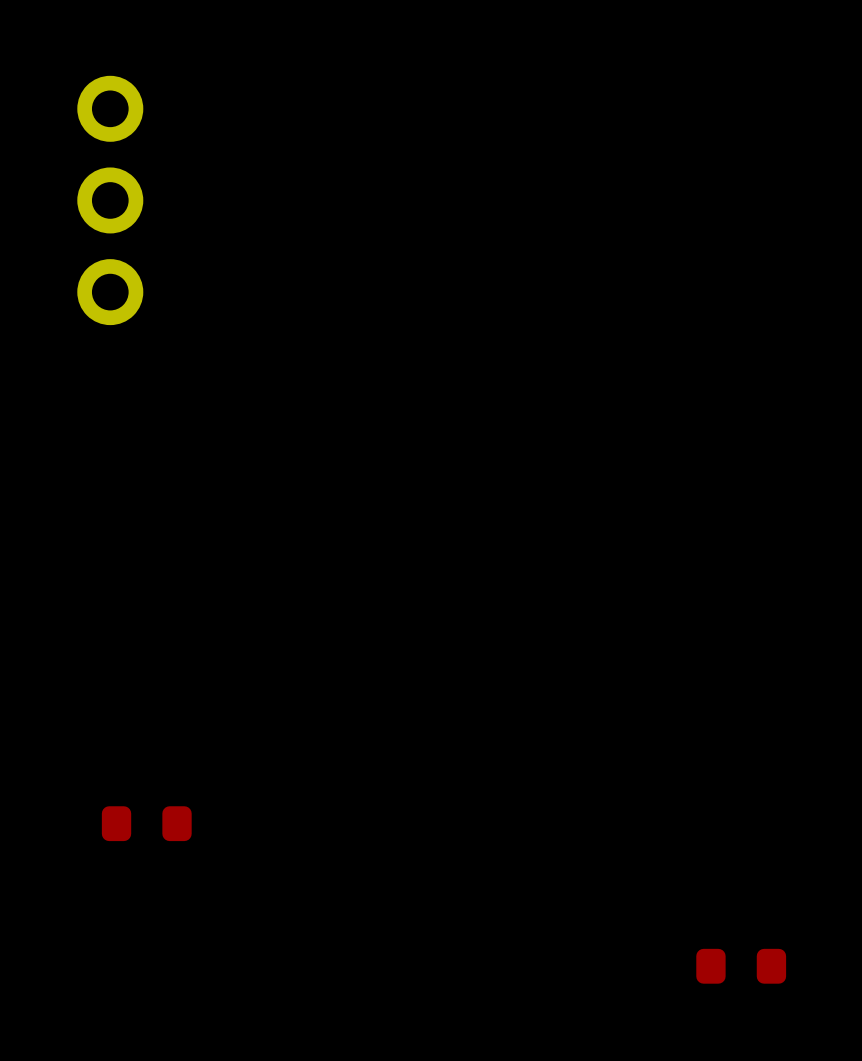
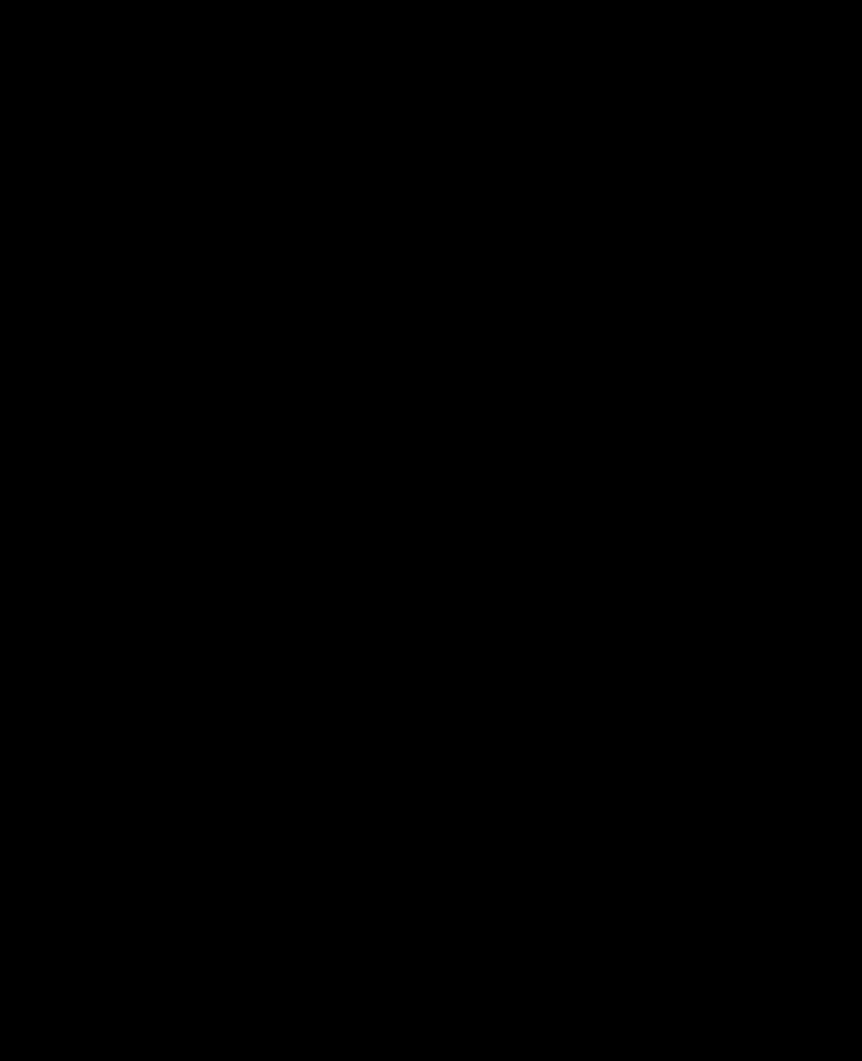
part: (110, 200) -> none
part: (146, 823) -> none
part: (741, 966) -> none

